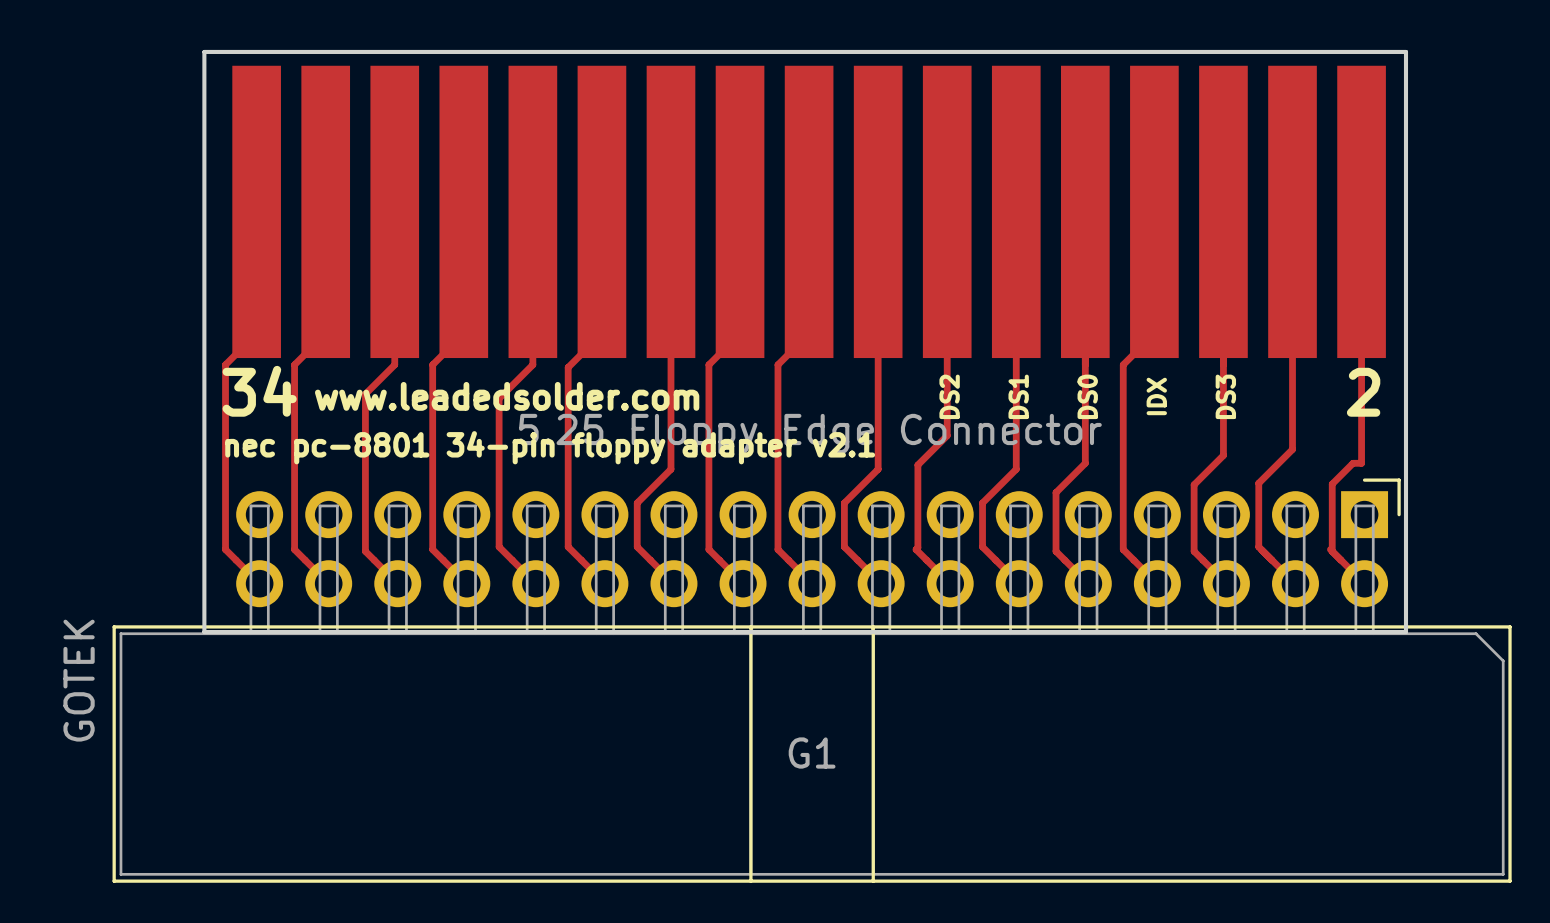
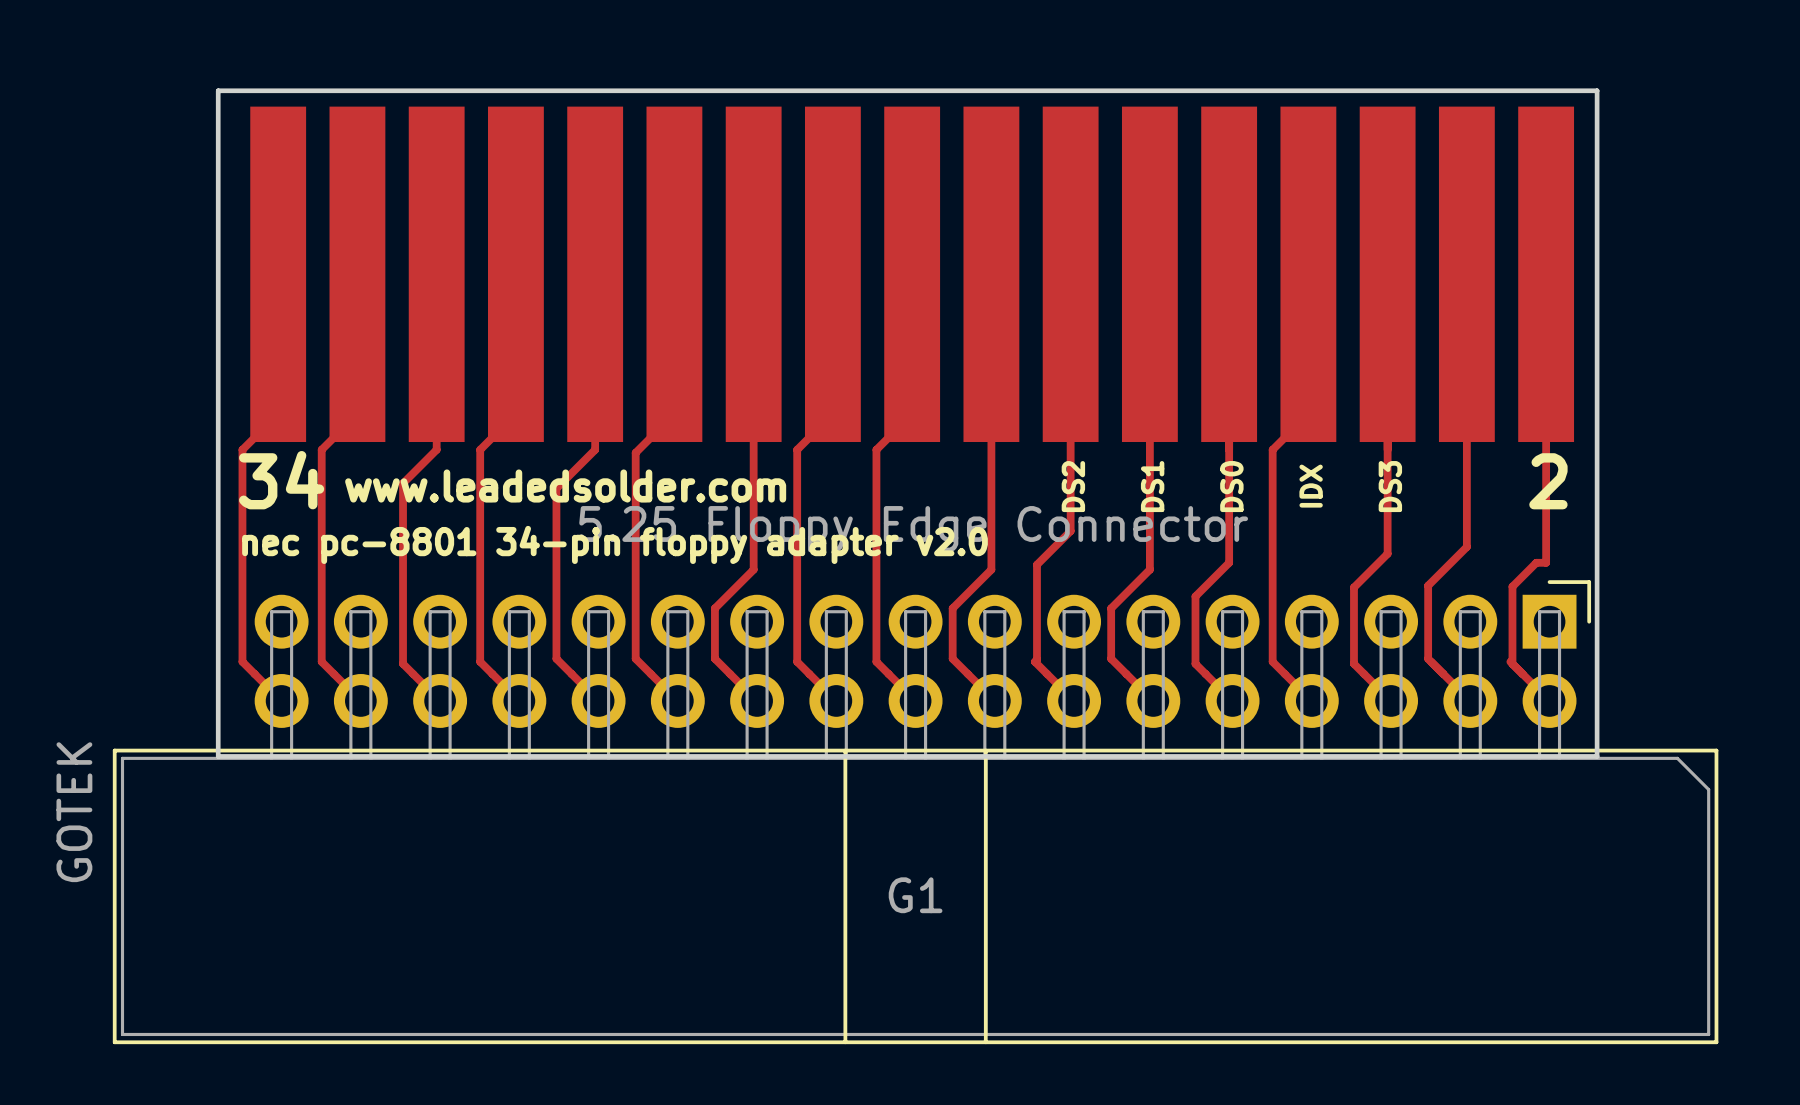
text: nec pc-8801 34-pin floppy adapter v2.1 (550, 447) -> nec pc-8801 34-pin floppy adapter v2.0 (615, 544)

